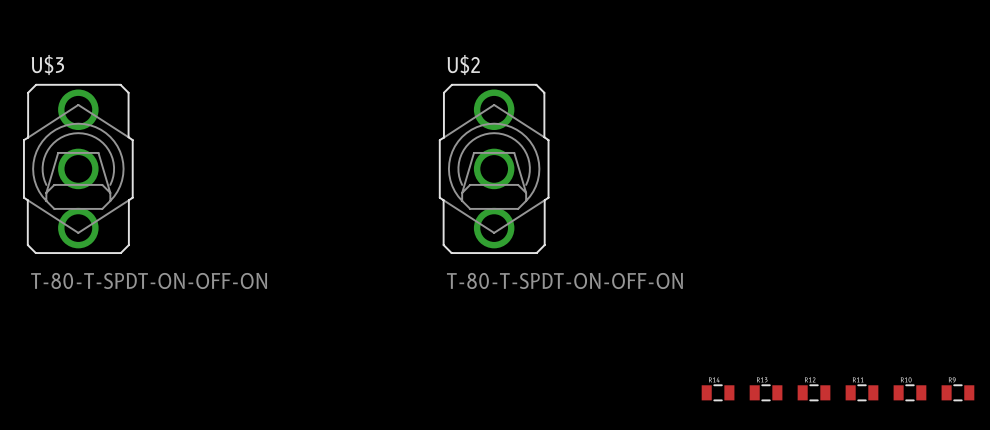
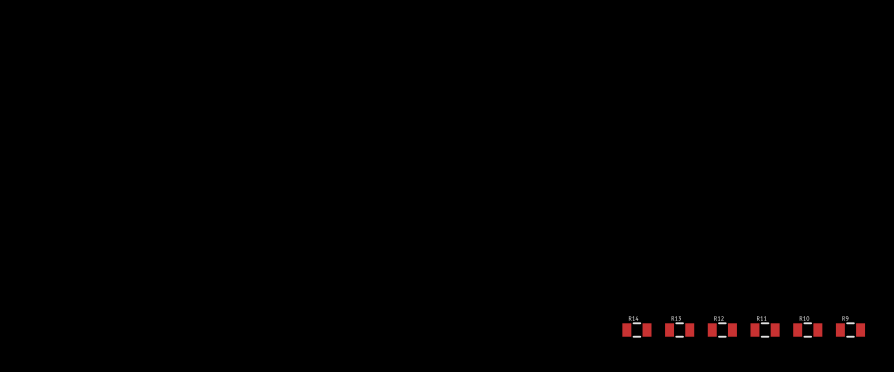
U$3: T-80-T-SPDT-ON-OFF-ON (78, 168) -> none
U$2: T-80-T-SPDT-ON-OFF-ON (494, 168) -> none

